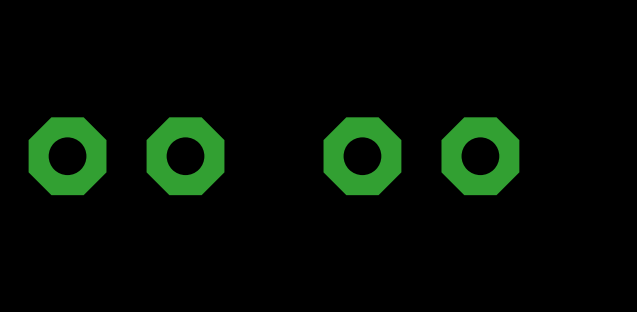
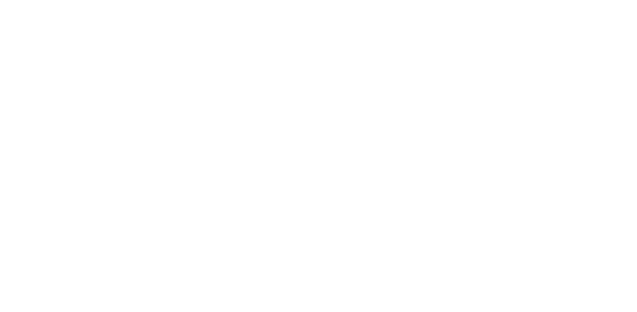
part: (126, 156) -> none
part: (421, 156) -> none

